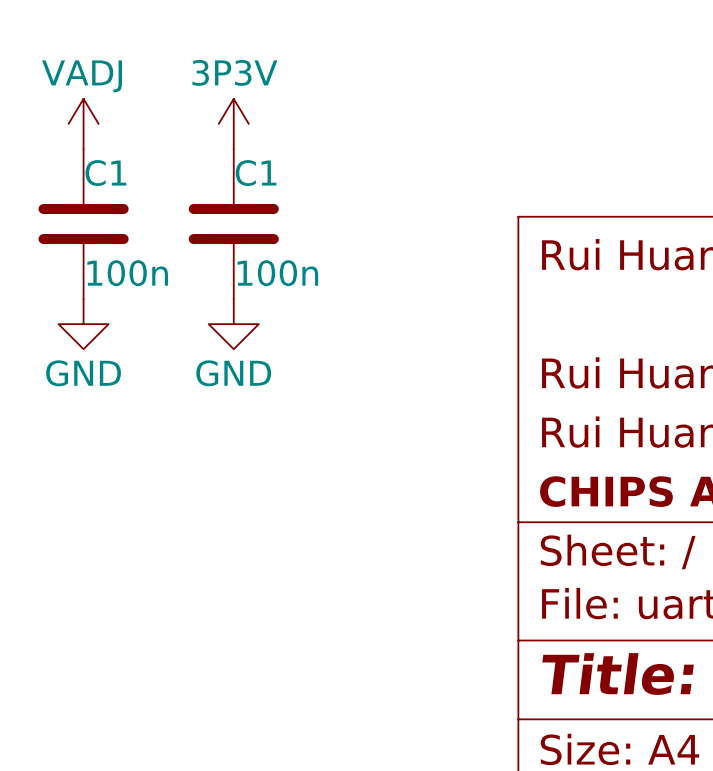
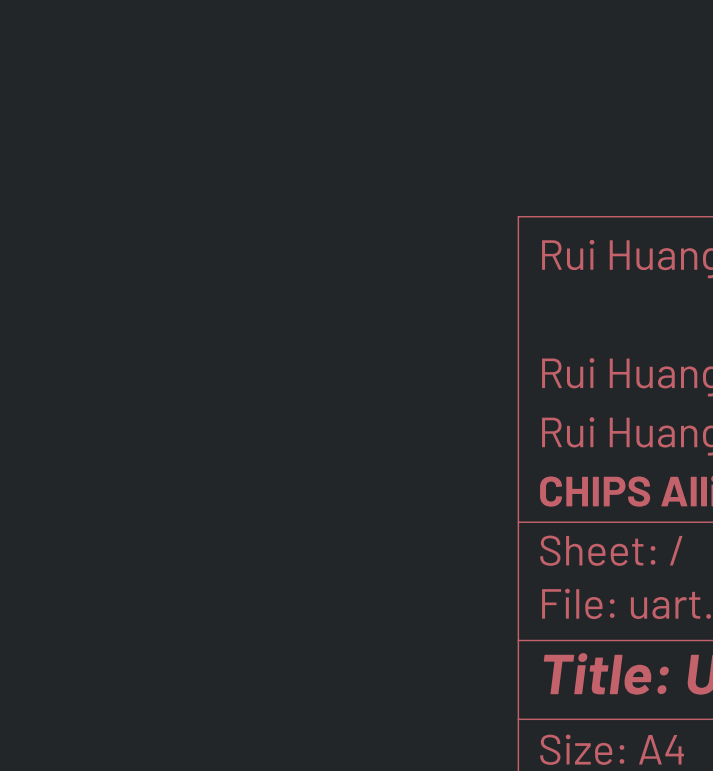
power symbol: VADJ (83, 123) -> none
power symbol: 3P3V (233, 123) -> none
C1: 100n (83, 224) -> none
C1: 100n (233, 224) -> none
power symbol: GND (83, 324) -> none
power symbol: GND (233, 324) -> none

